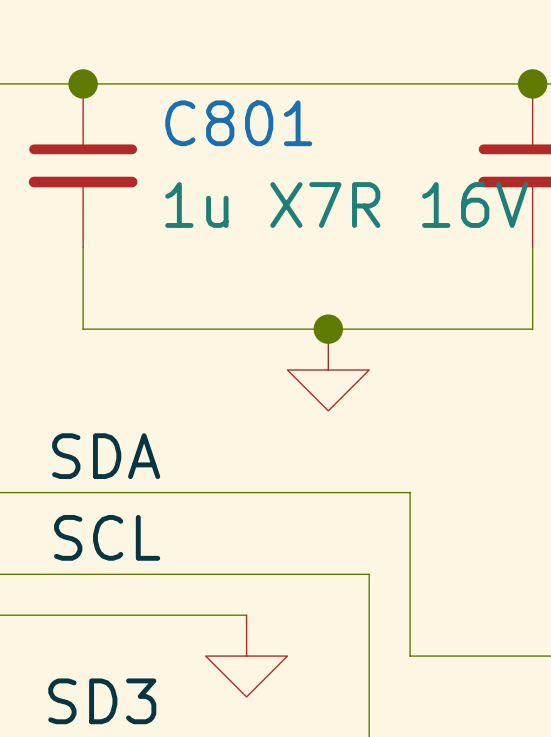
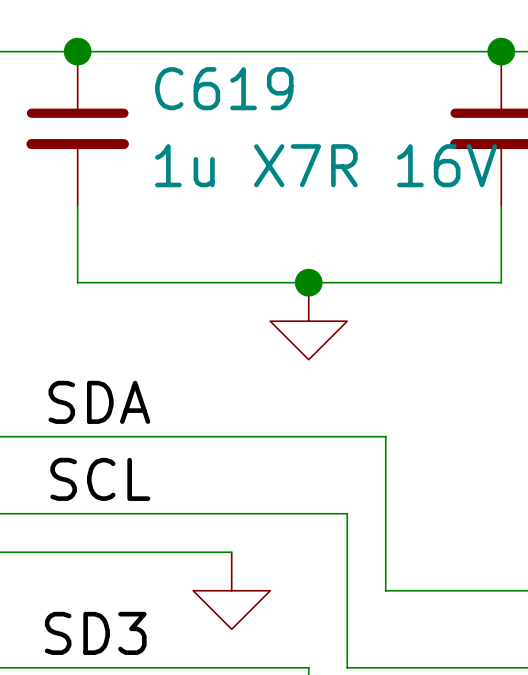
C801 name: C801 (238, 123) -> C619 (224, 88)

